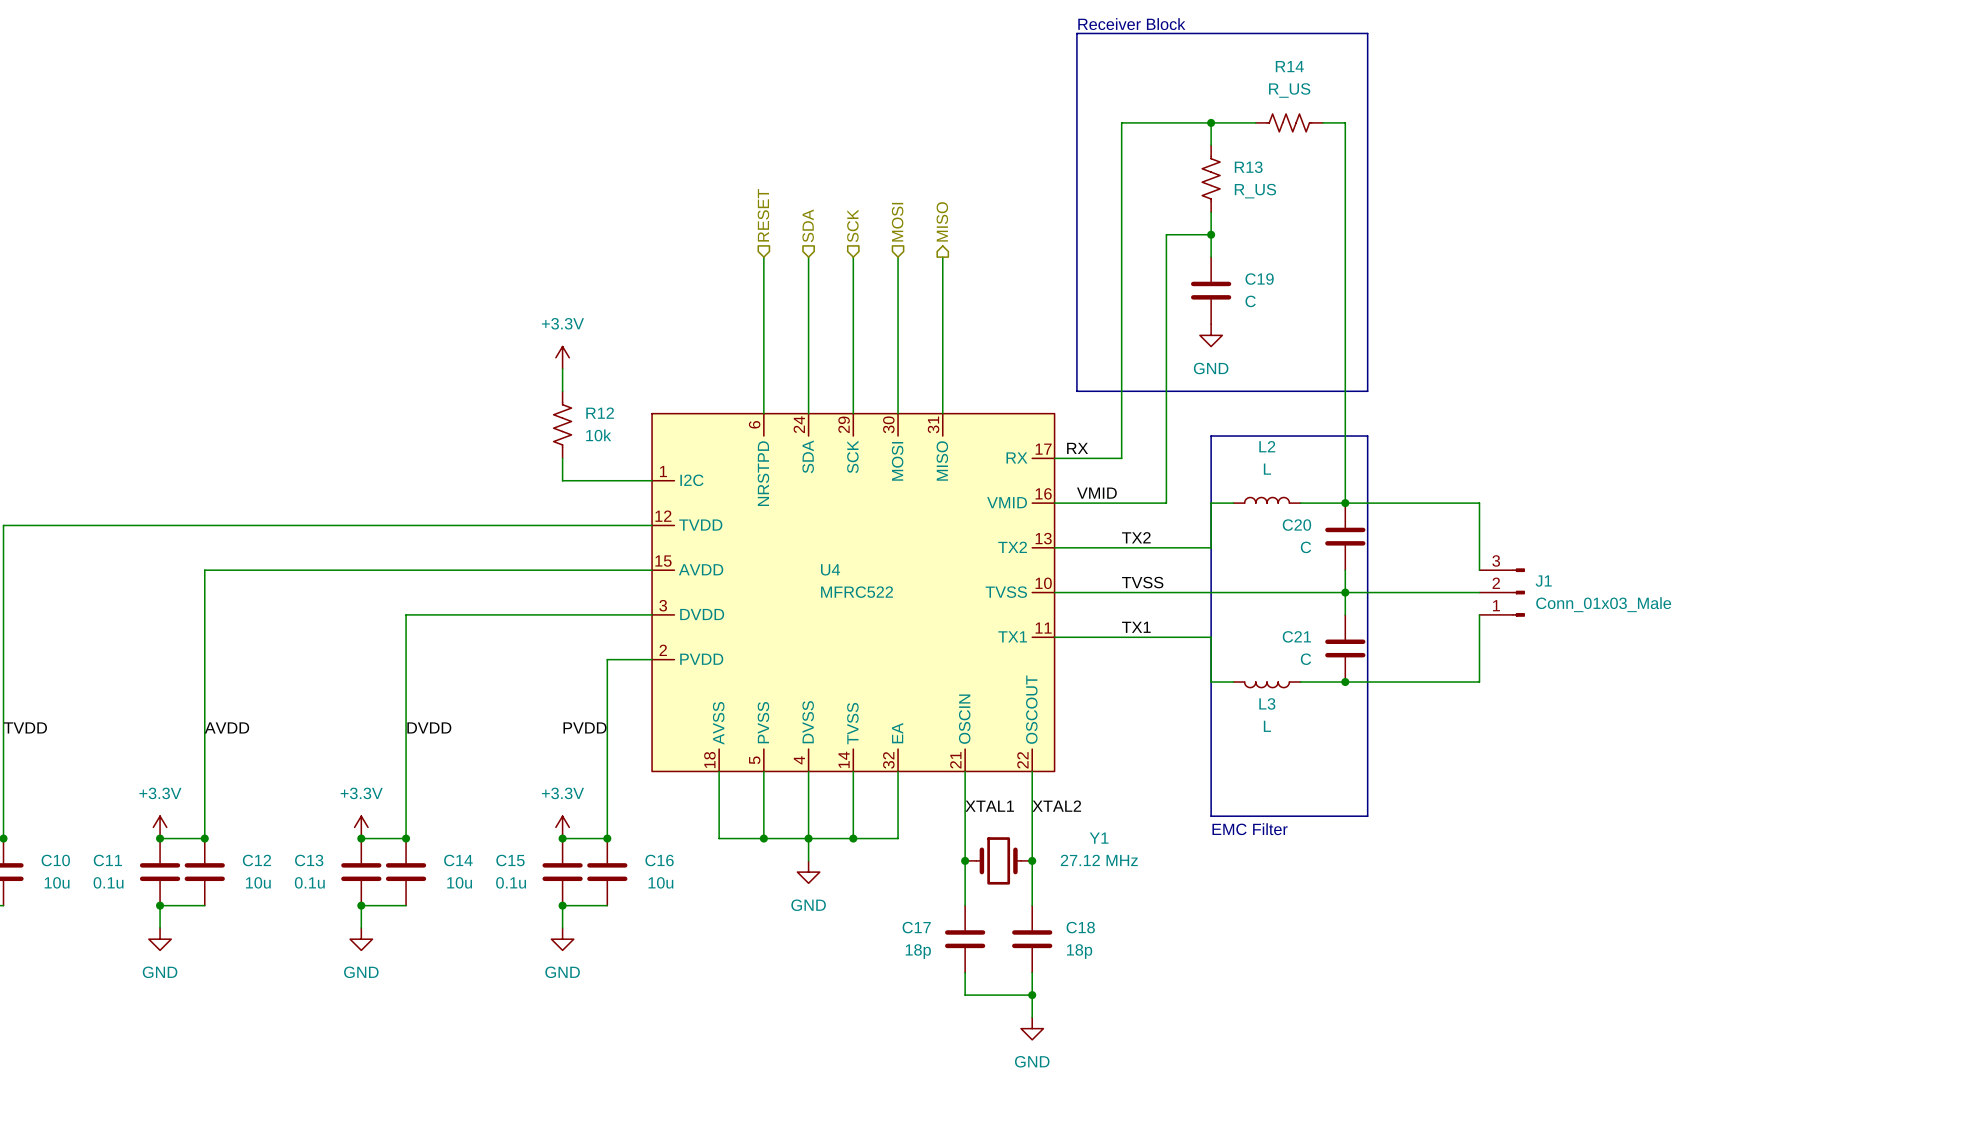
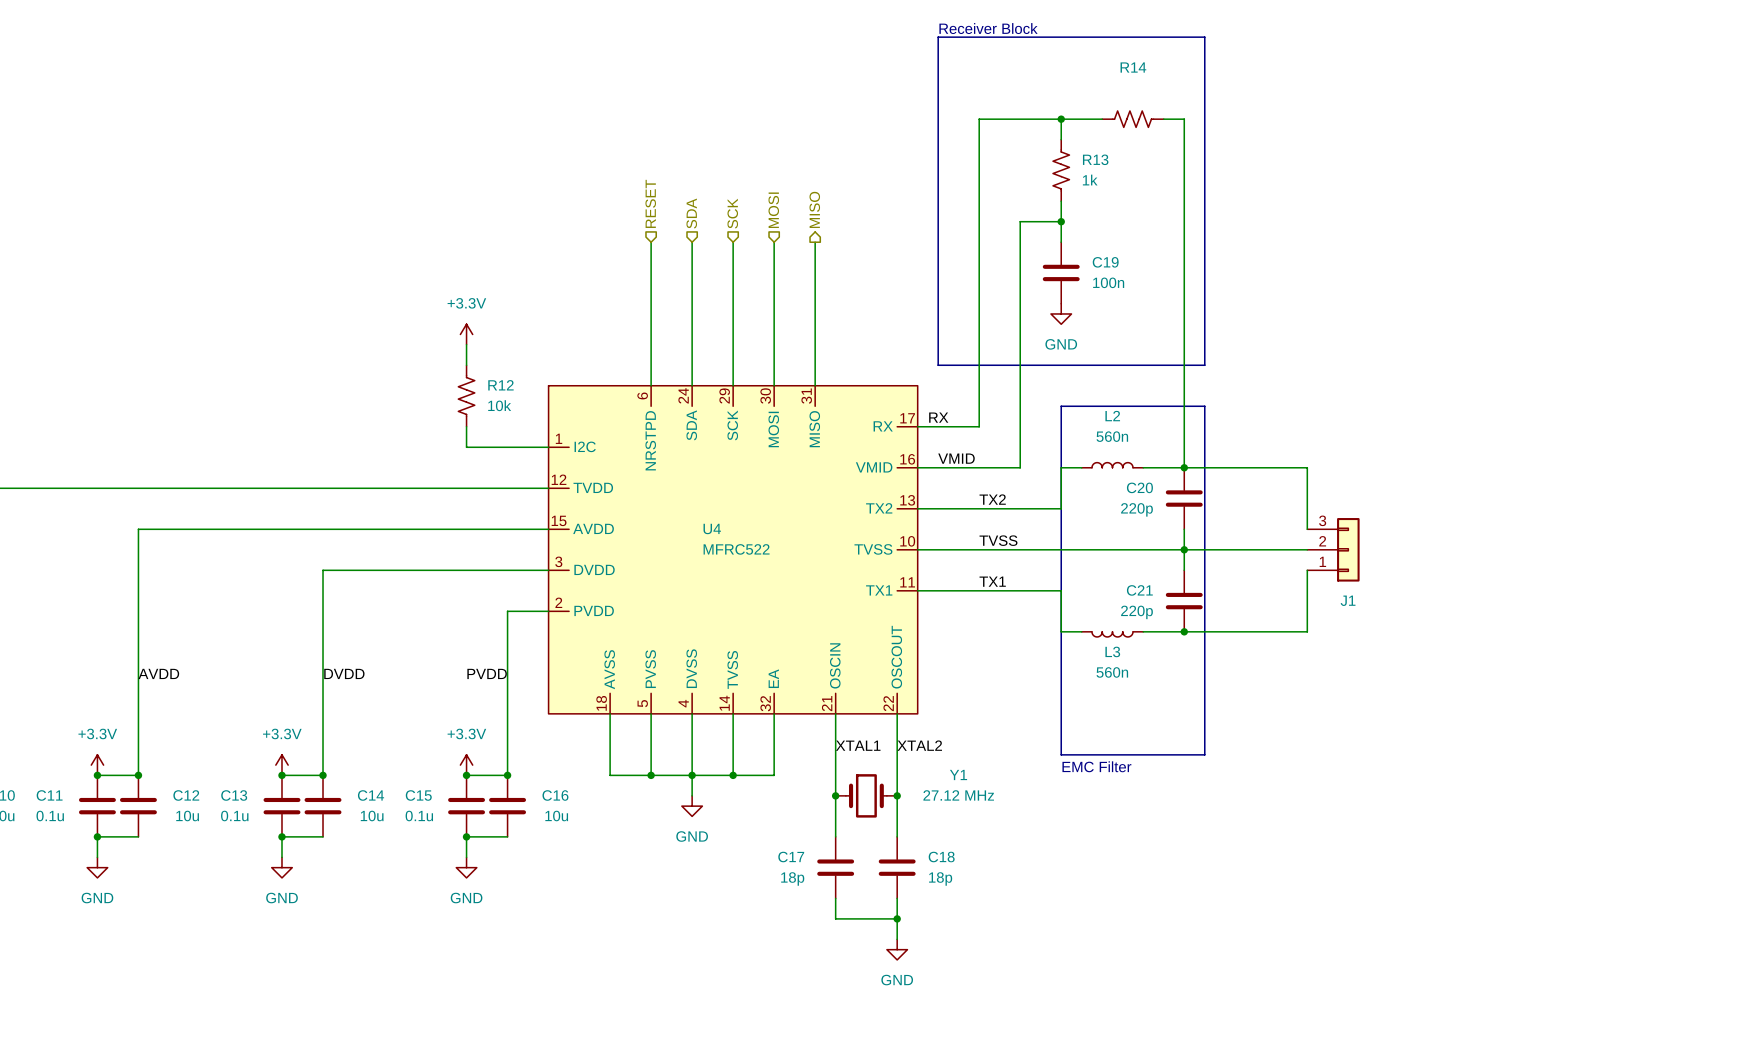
R14 value: R_US (1289, 90) -> none
R13 value: R_US (1255, 191) -> 1k (1090, 180)
C19 value: C (1250, 301) -> 100n (1108, 282)
L2 value: L (1267, 469) -> 560n (1112, 436)
C20 value: C (1305, 547) -> 220p (1136, 509)
J1 symbol: [1479, 568, 1525, 617] -> [1307, 518, 1360, 582]
J1 name position: J1 (1543, 581) -> J1 (1348, 600)
J1 value: Conn_01x03_Male (1603, 604) -> none
C21 value: C (1305, 659) -> 220p (1136, 612)
L3 value: L (1267, 726) -> 560n (1112, 672)

